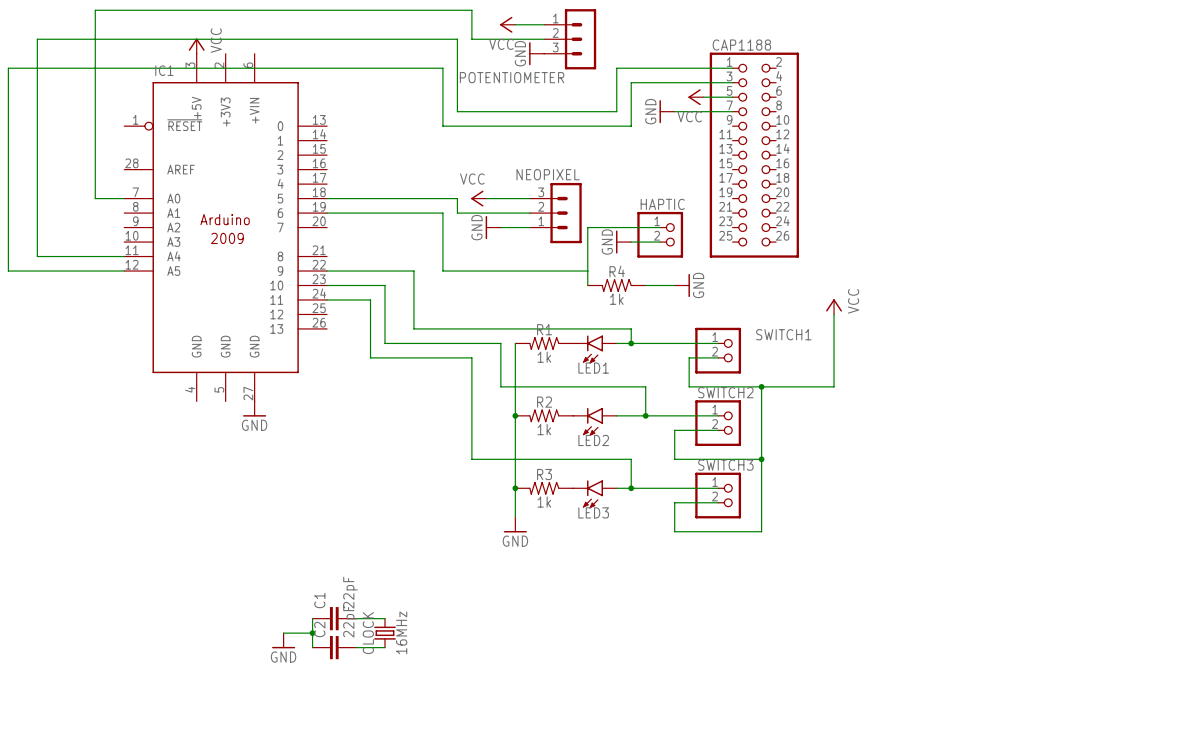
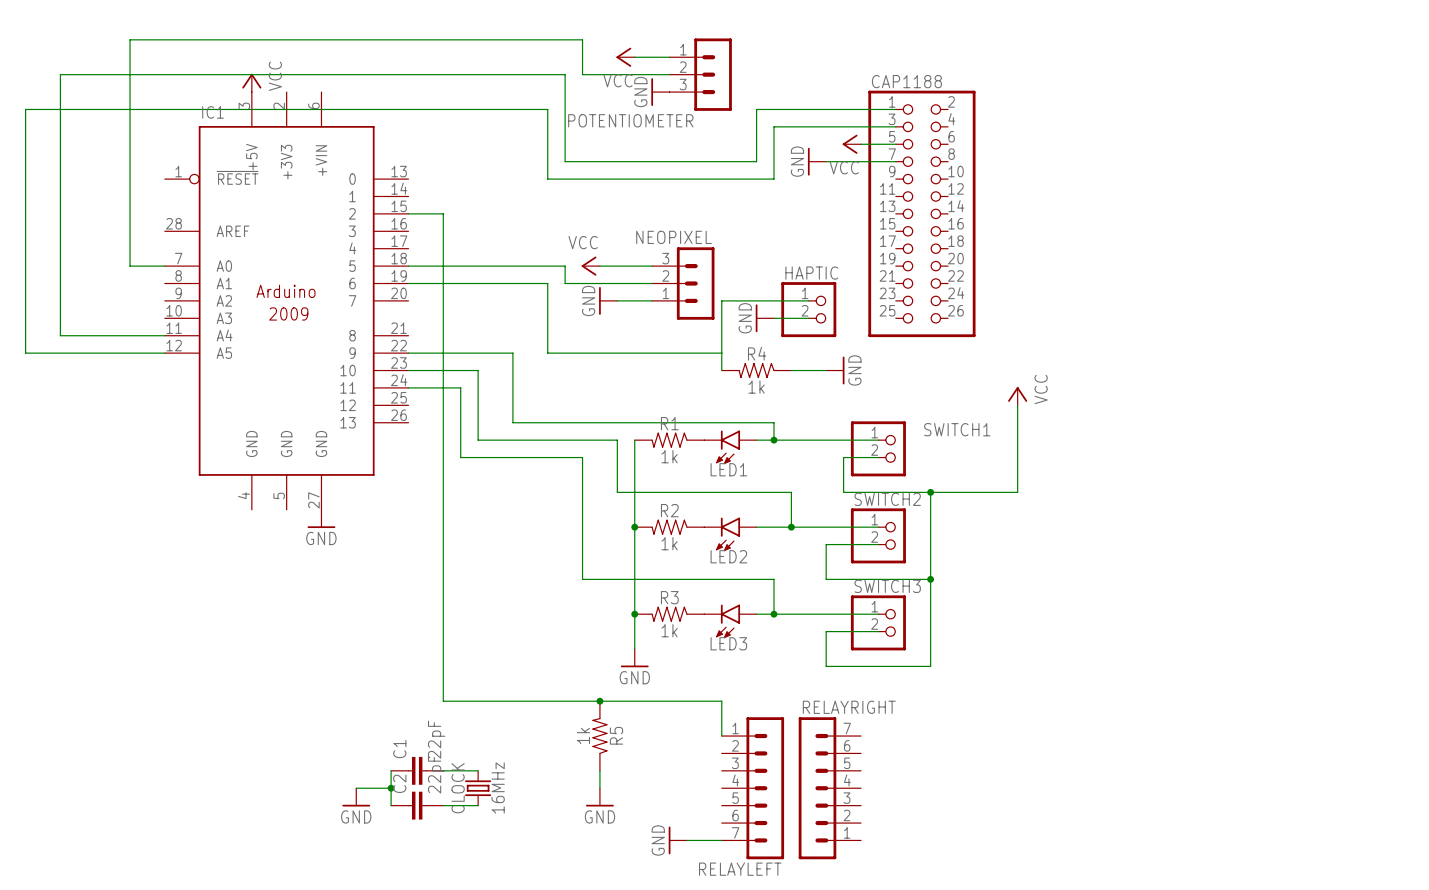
wire: none -> (408, 213) (443, 213) (443, 701) (721, 701) (721, 736)
junction: none -> (599, 701)
R5: none -> 1k (599, 736)
wire: none -> (599, 770) (599, 788)
RELAYLEFT: none -> (752, 788)
RELAYRIGHT: none -> (829, 788)
power symbol: none -> GND (599, 797)
power symbol: none -> GND (677, 840)
wire: none -> (686, 840) (721, 840)

